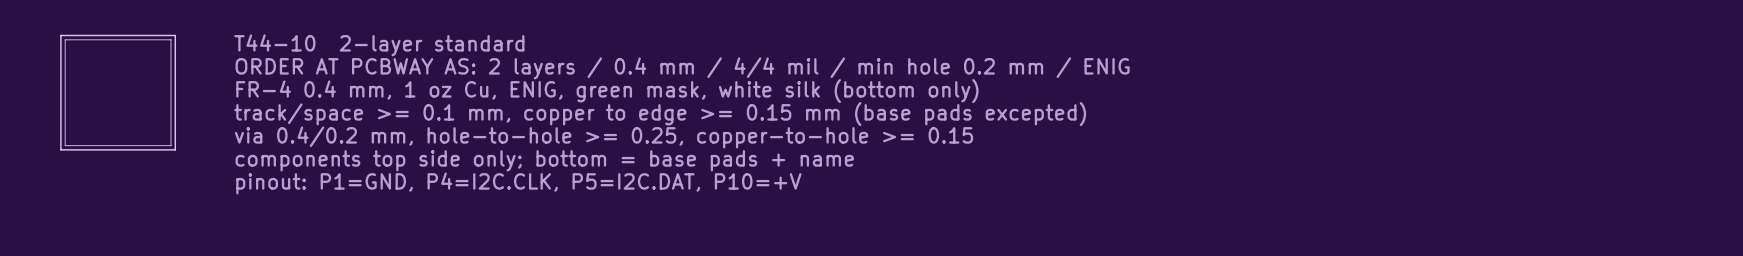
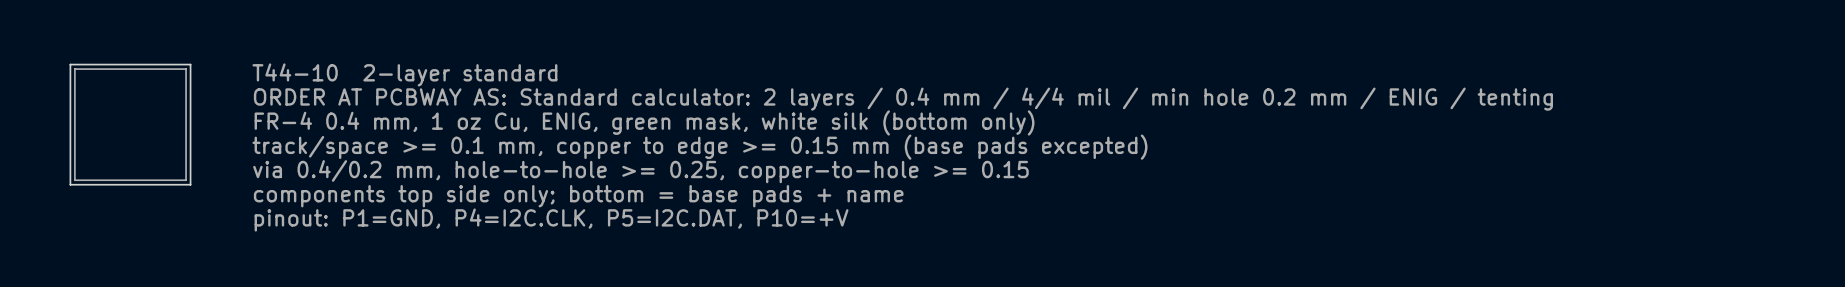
text: ORDER AT PCBWAY AS: 2 layers / 0.4 mm / 4/4 mil / min hole 0.2 mm / ENIG (682, 68) -> ORDER AT PCBWAY AS: Standard calculator: 2 layers / 0.4 mm / 4/4 mil / min hole 0.2 mm / ENIG / tenting (903, 99)

